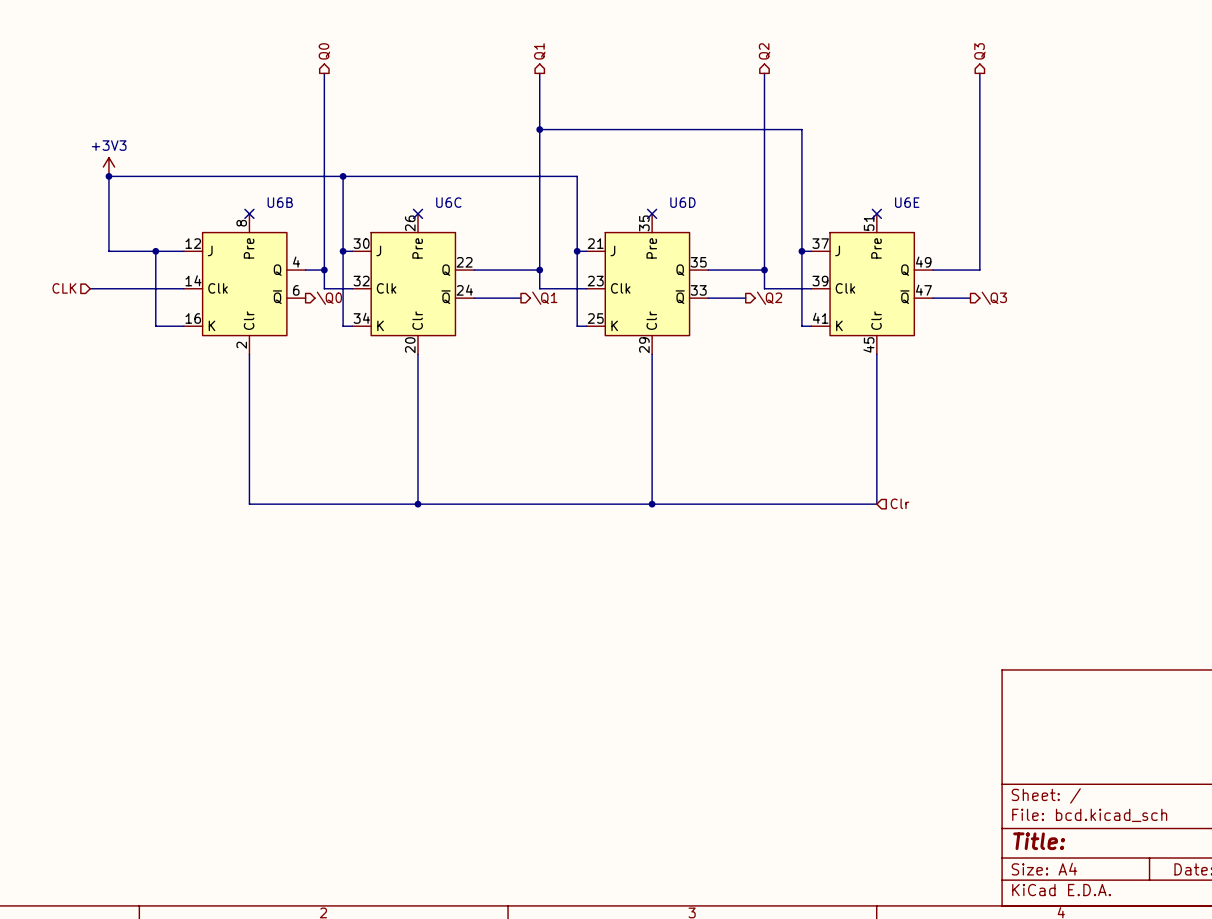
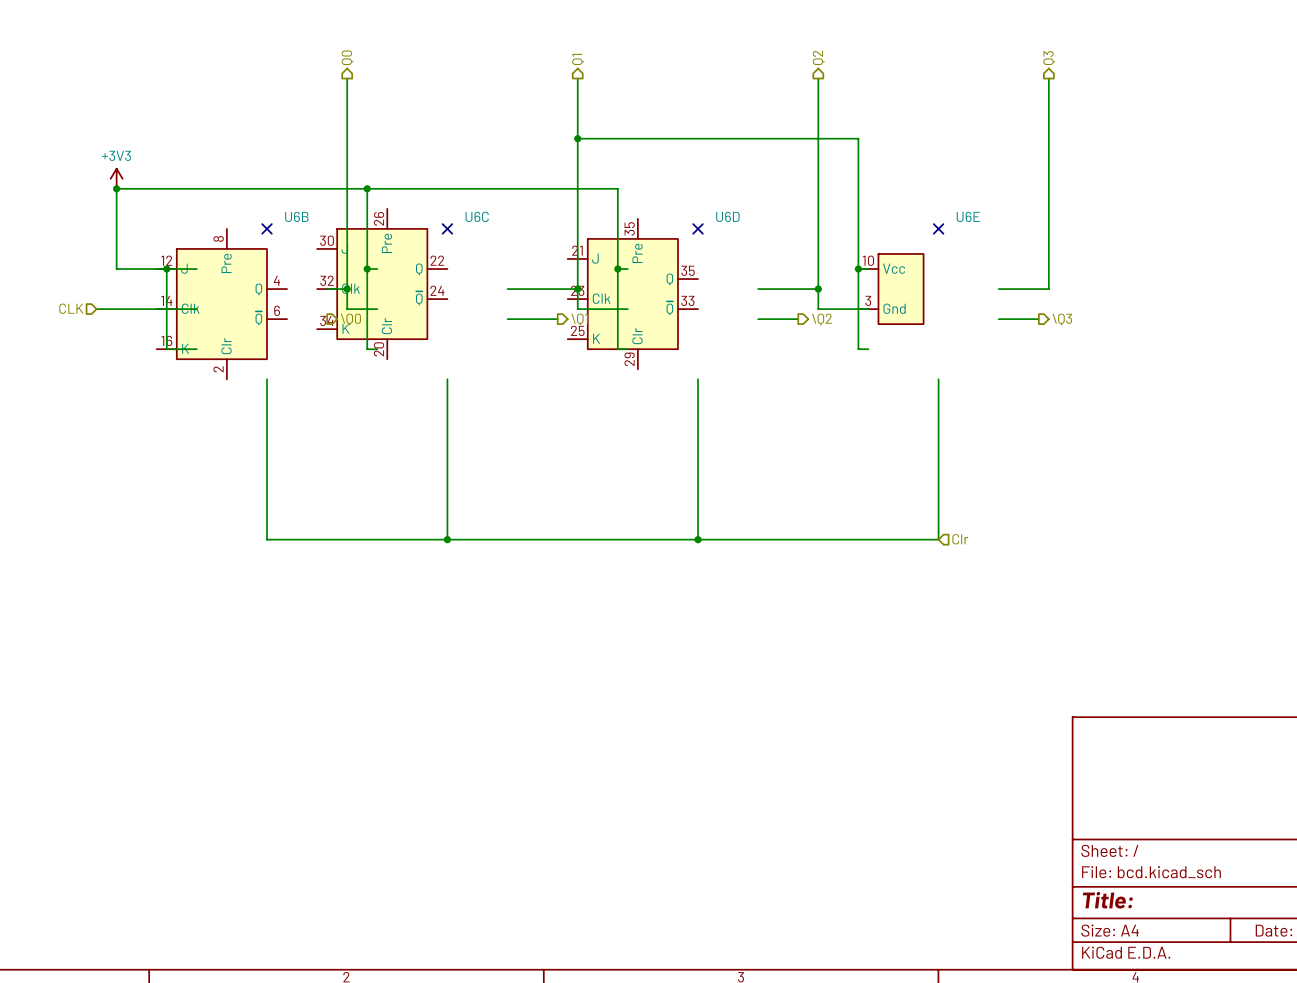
U6E symbol: [811, 213, 934, 355] -> [858, 253, 924, 325]
U6B position: (244, 284) -> (221, 304)
U6C position: (413, 284) -> (382, 284)
U6D position: (647, 284) -> (632, 294)

